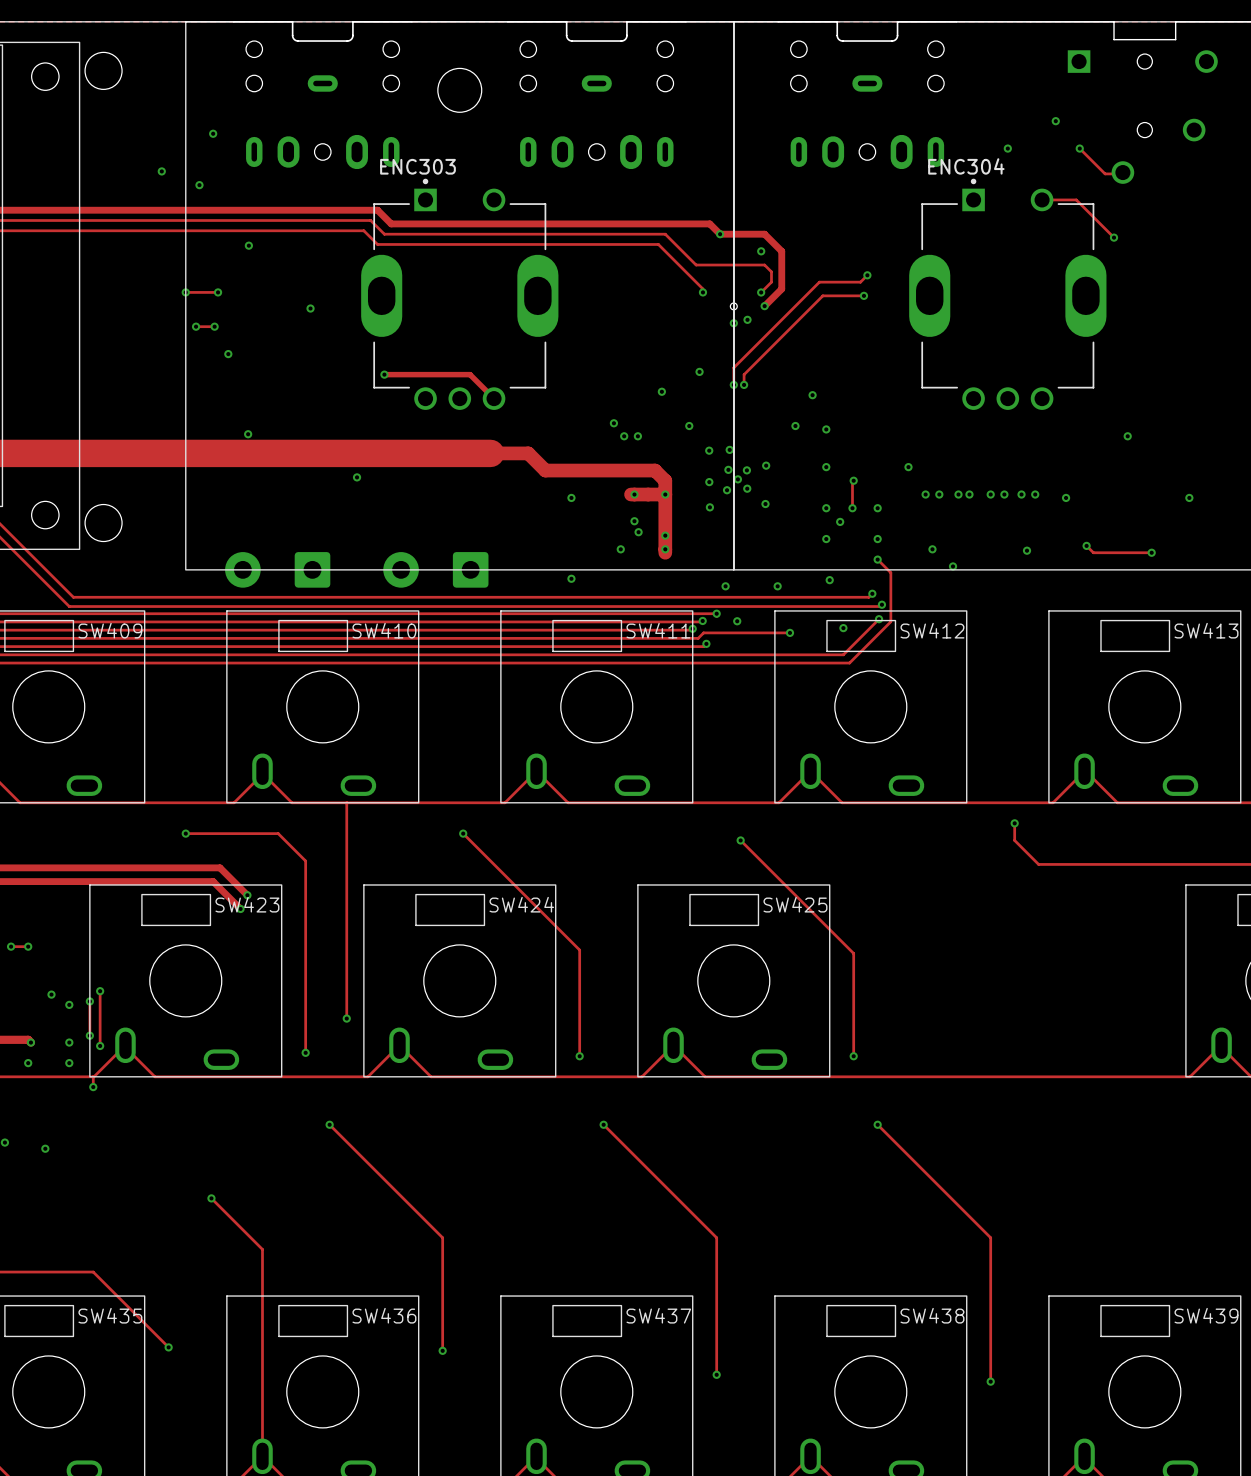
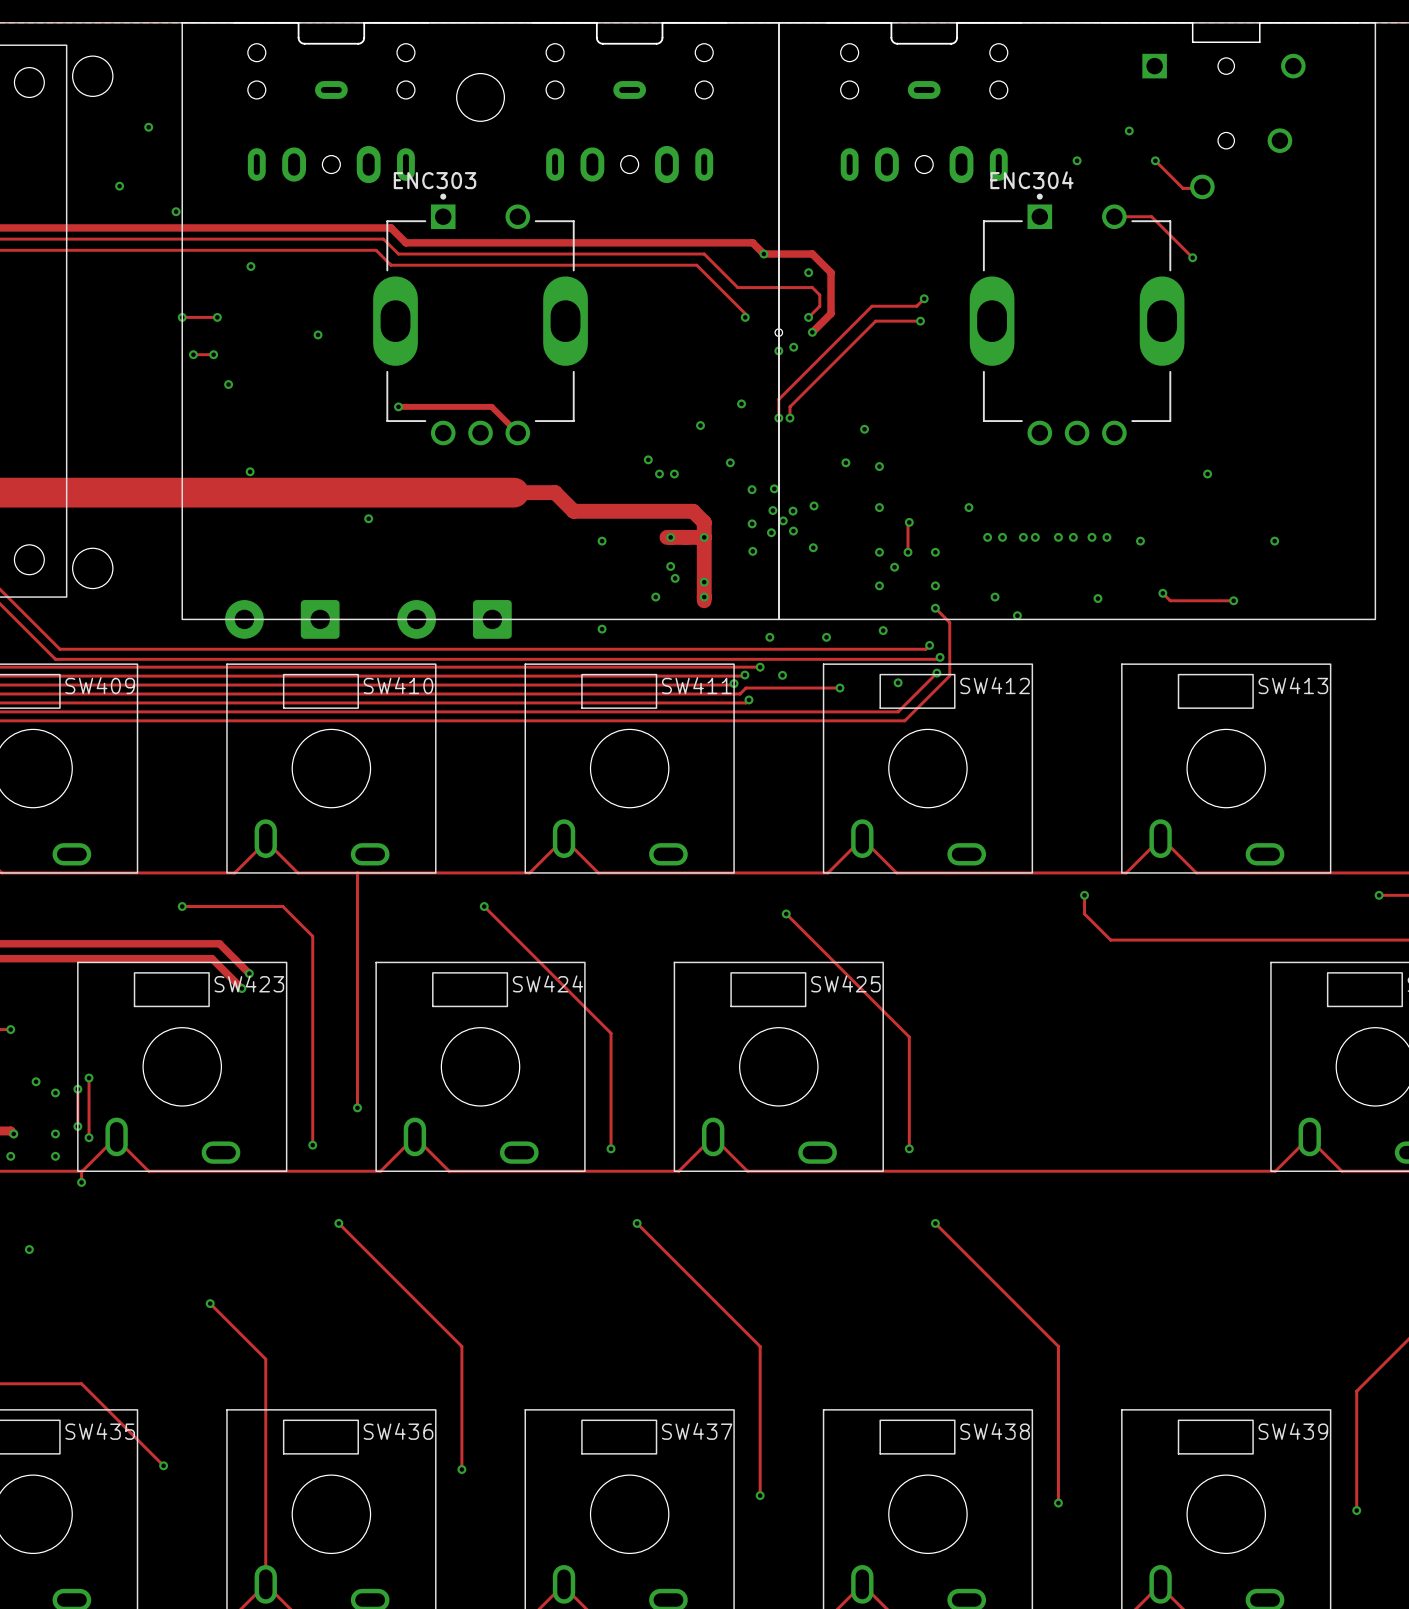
via: none -> (148, 127)
via: (213, 133) -> none
via: none -> (119, 186)
via: (161, 171) -> none
via: (199, 185) -> none
via: none -> (176, 211)

